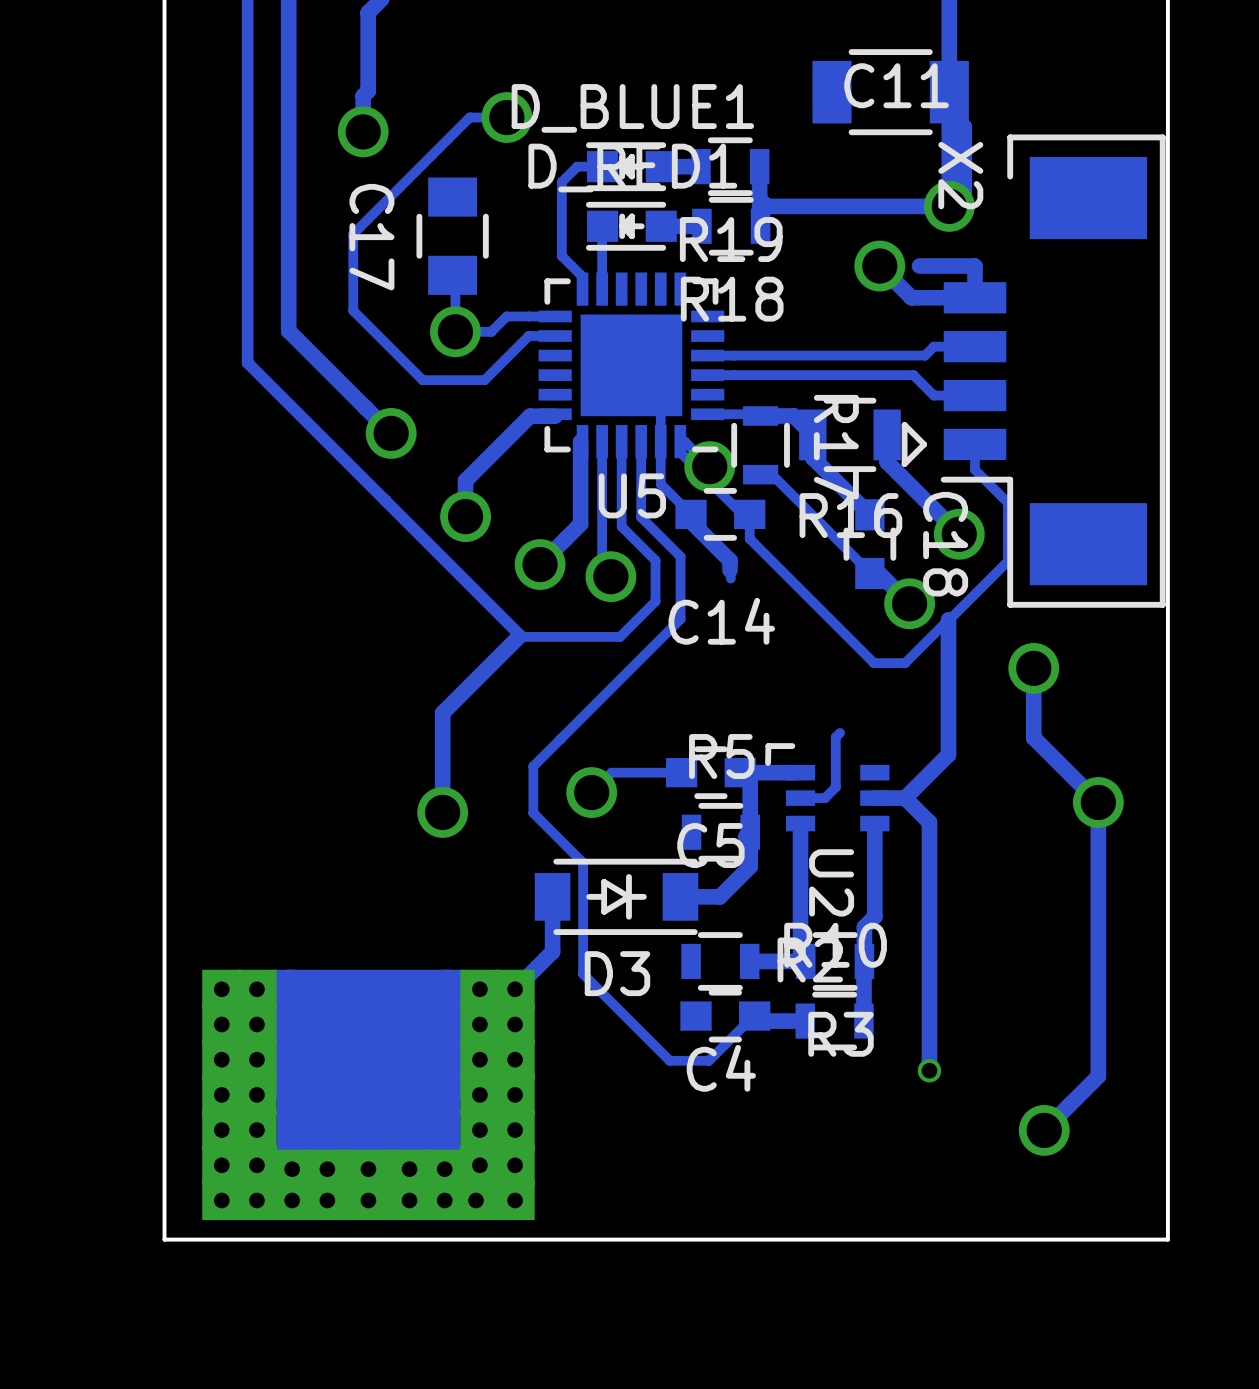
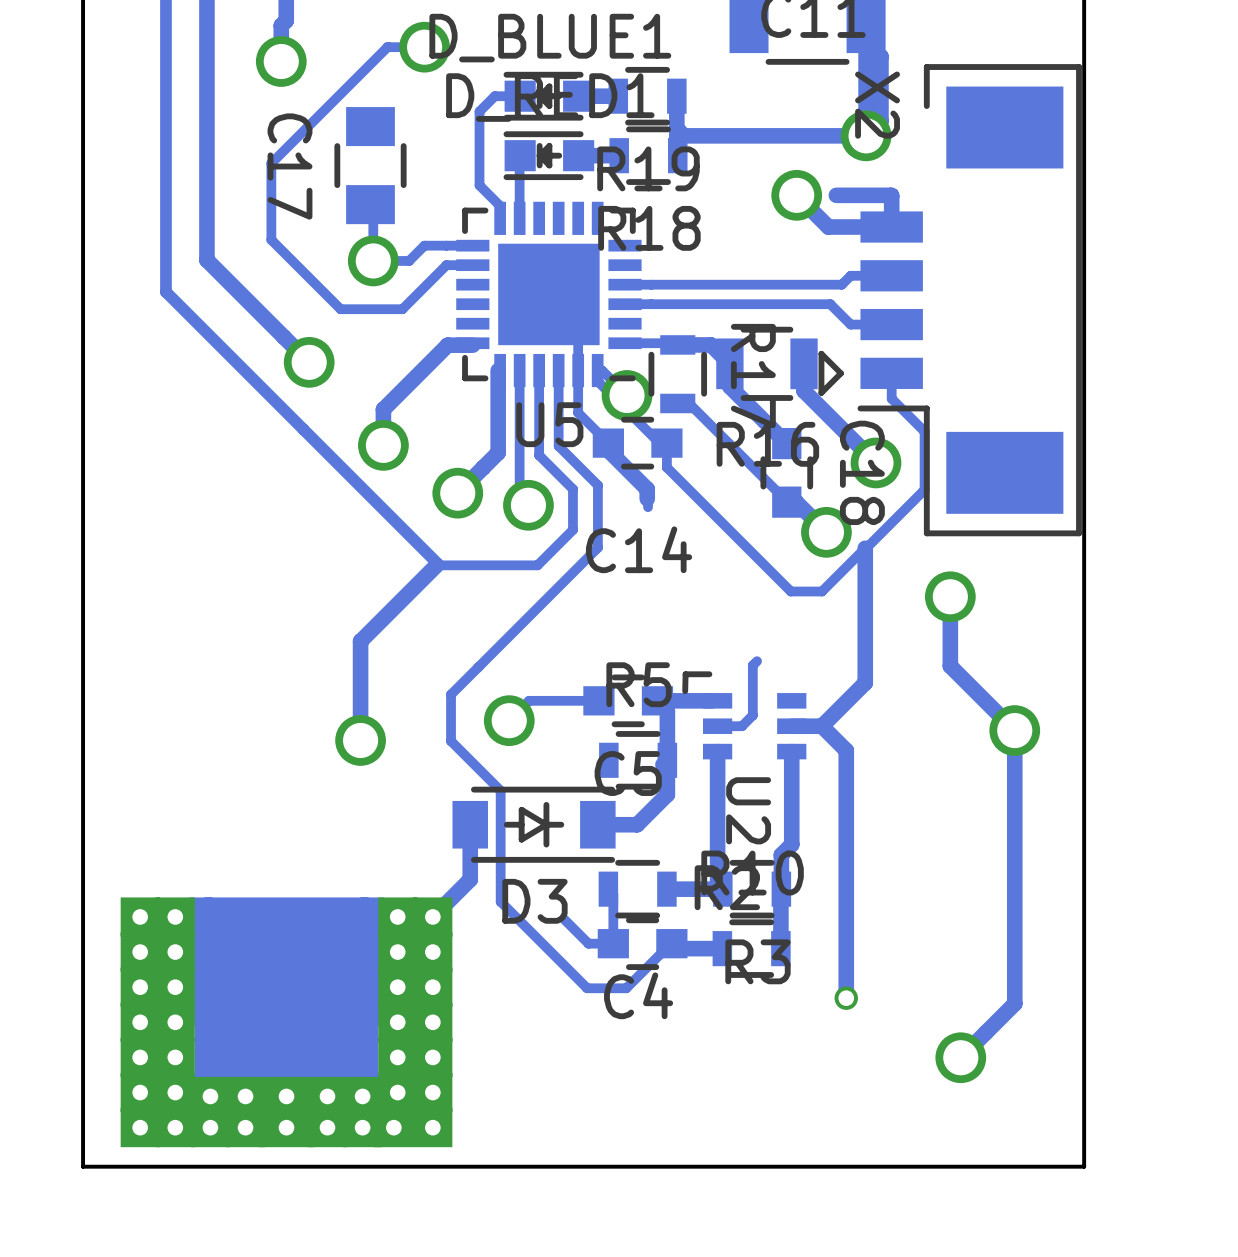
track: none -> (608, 889) (613, 894) (613, 943) (588, 943) (563, 918)

